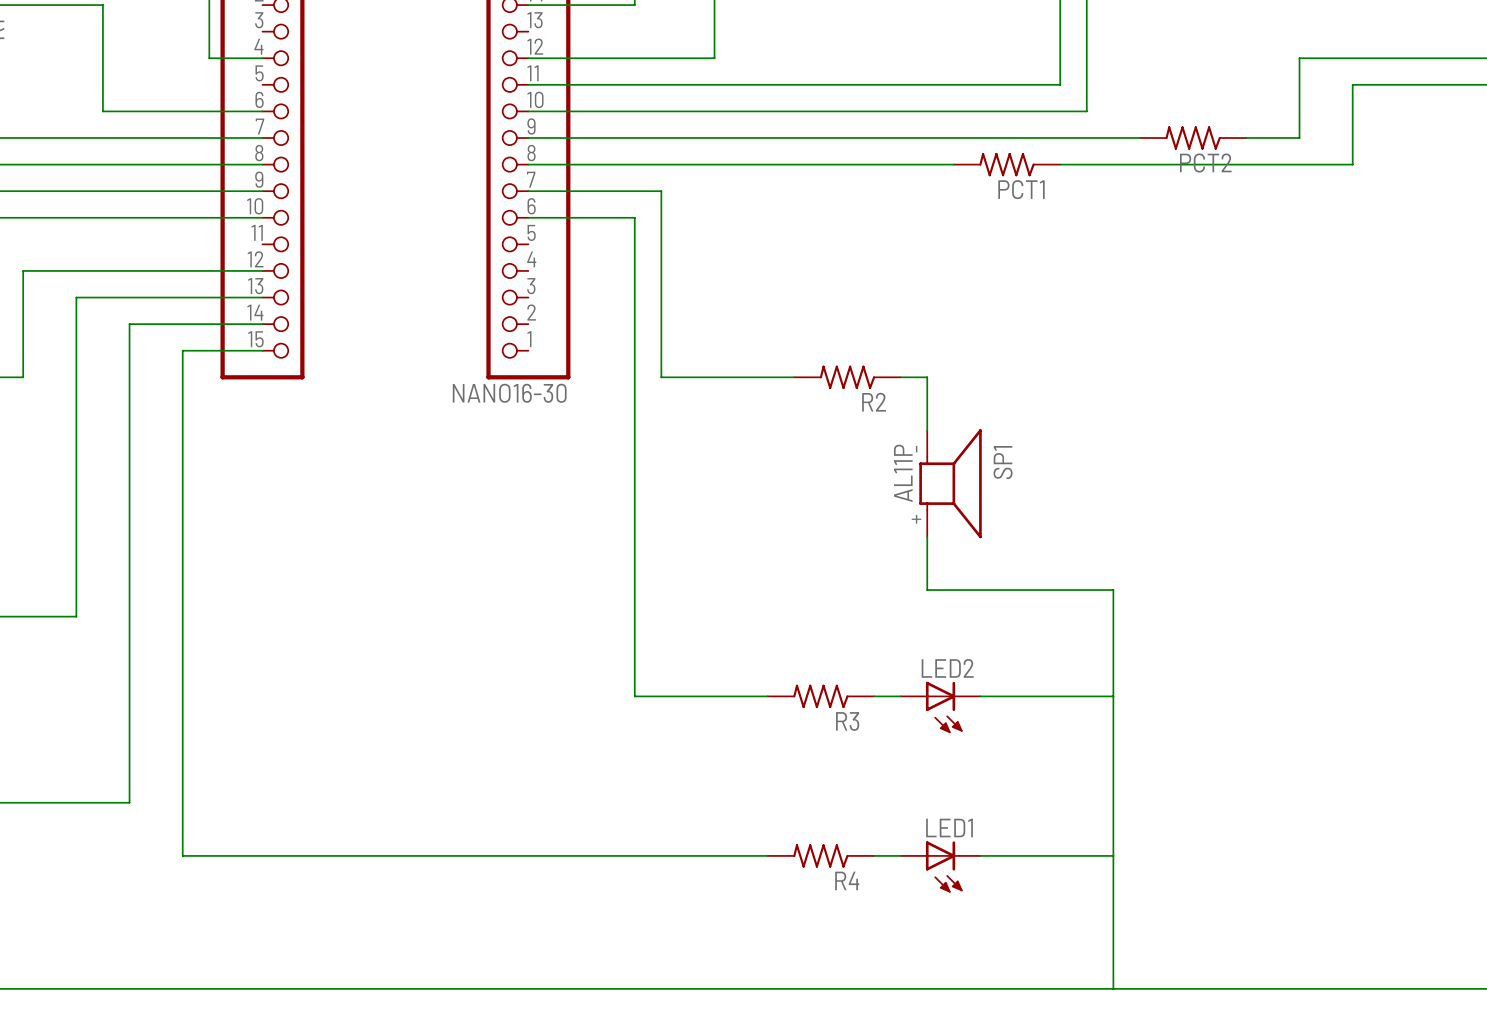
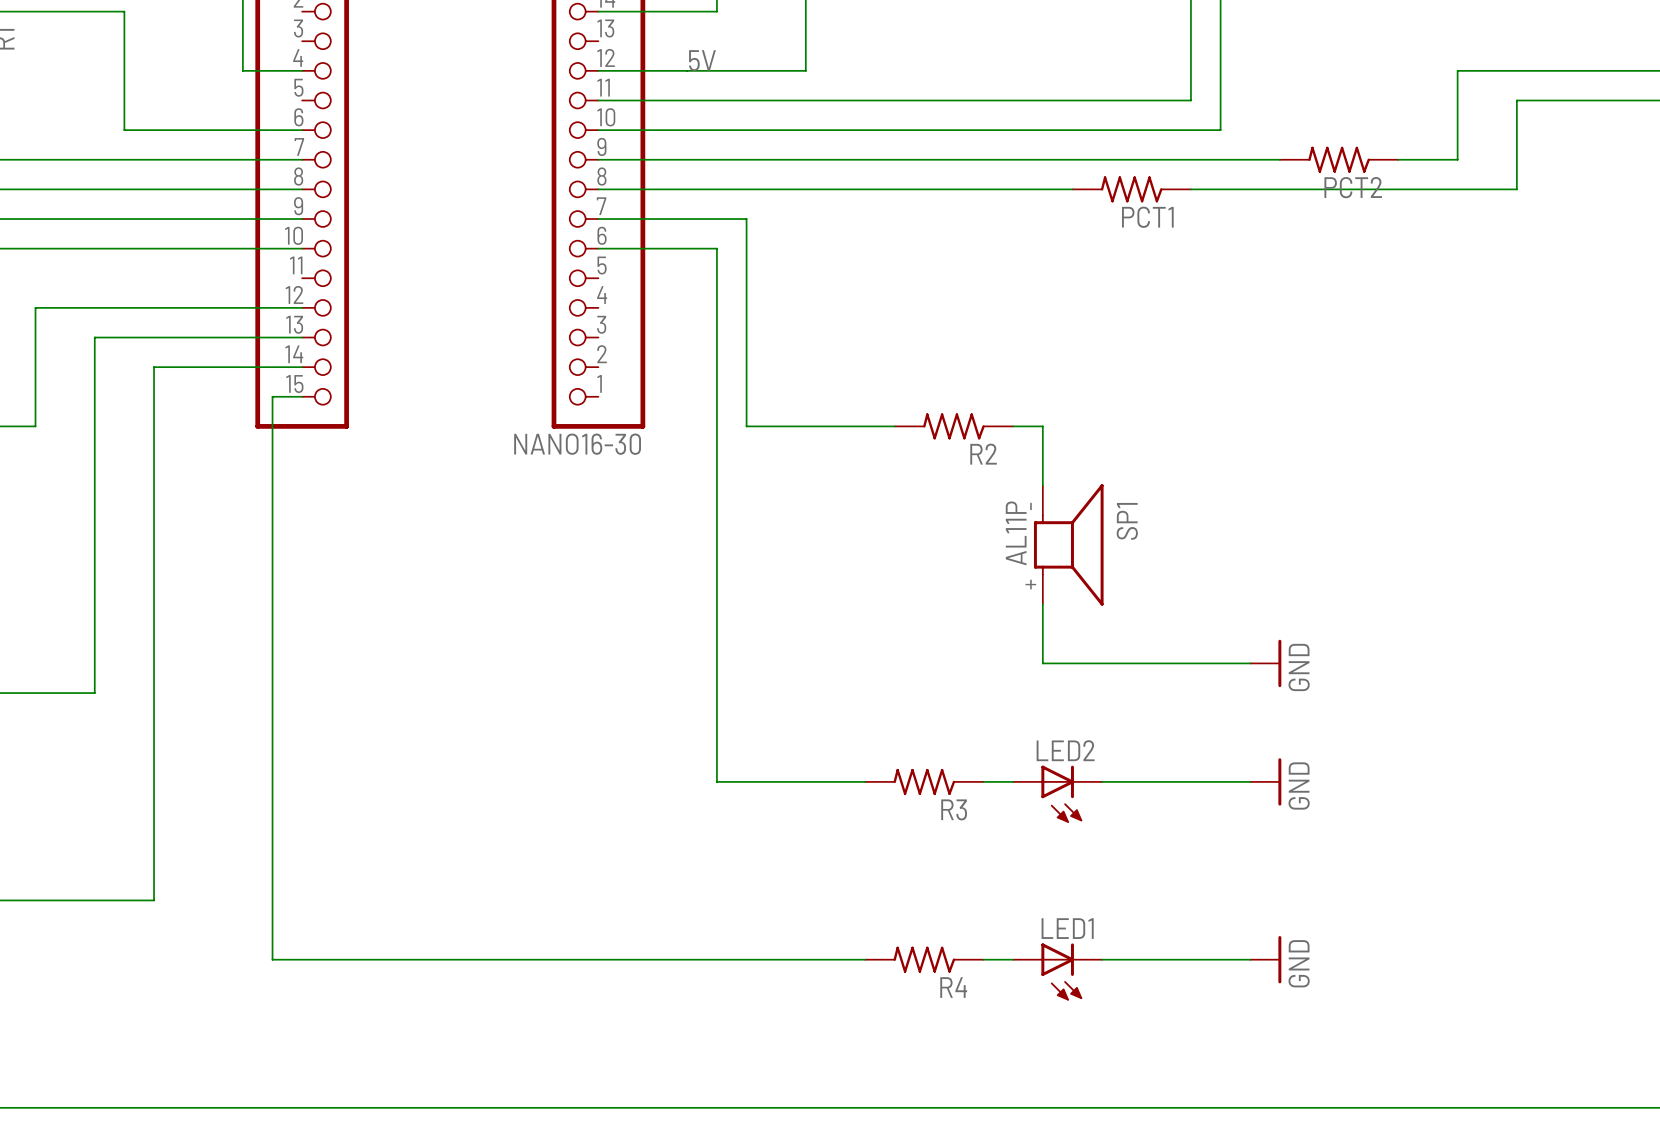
label: none -> 5V (702, 60)
wire: (235, 350) (182, 350) (182, 855) (235, 855) -> (272, 396) (272, 959)
wire: (1113, 590) (1113, 988) -> none
power symbol: none -> GND (1265, 663)
power symbol: none -> GND (1265, 781)
power symbol: none -> GND (1265, 959)

